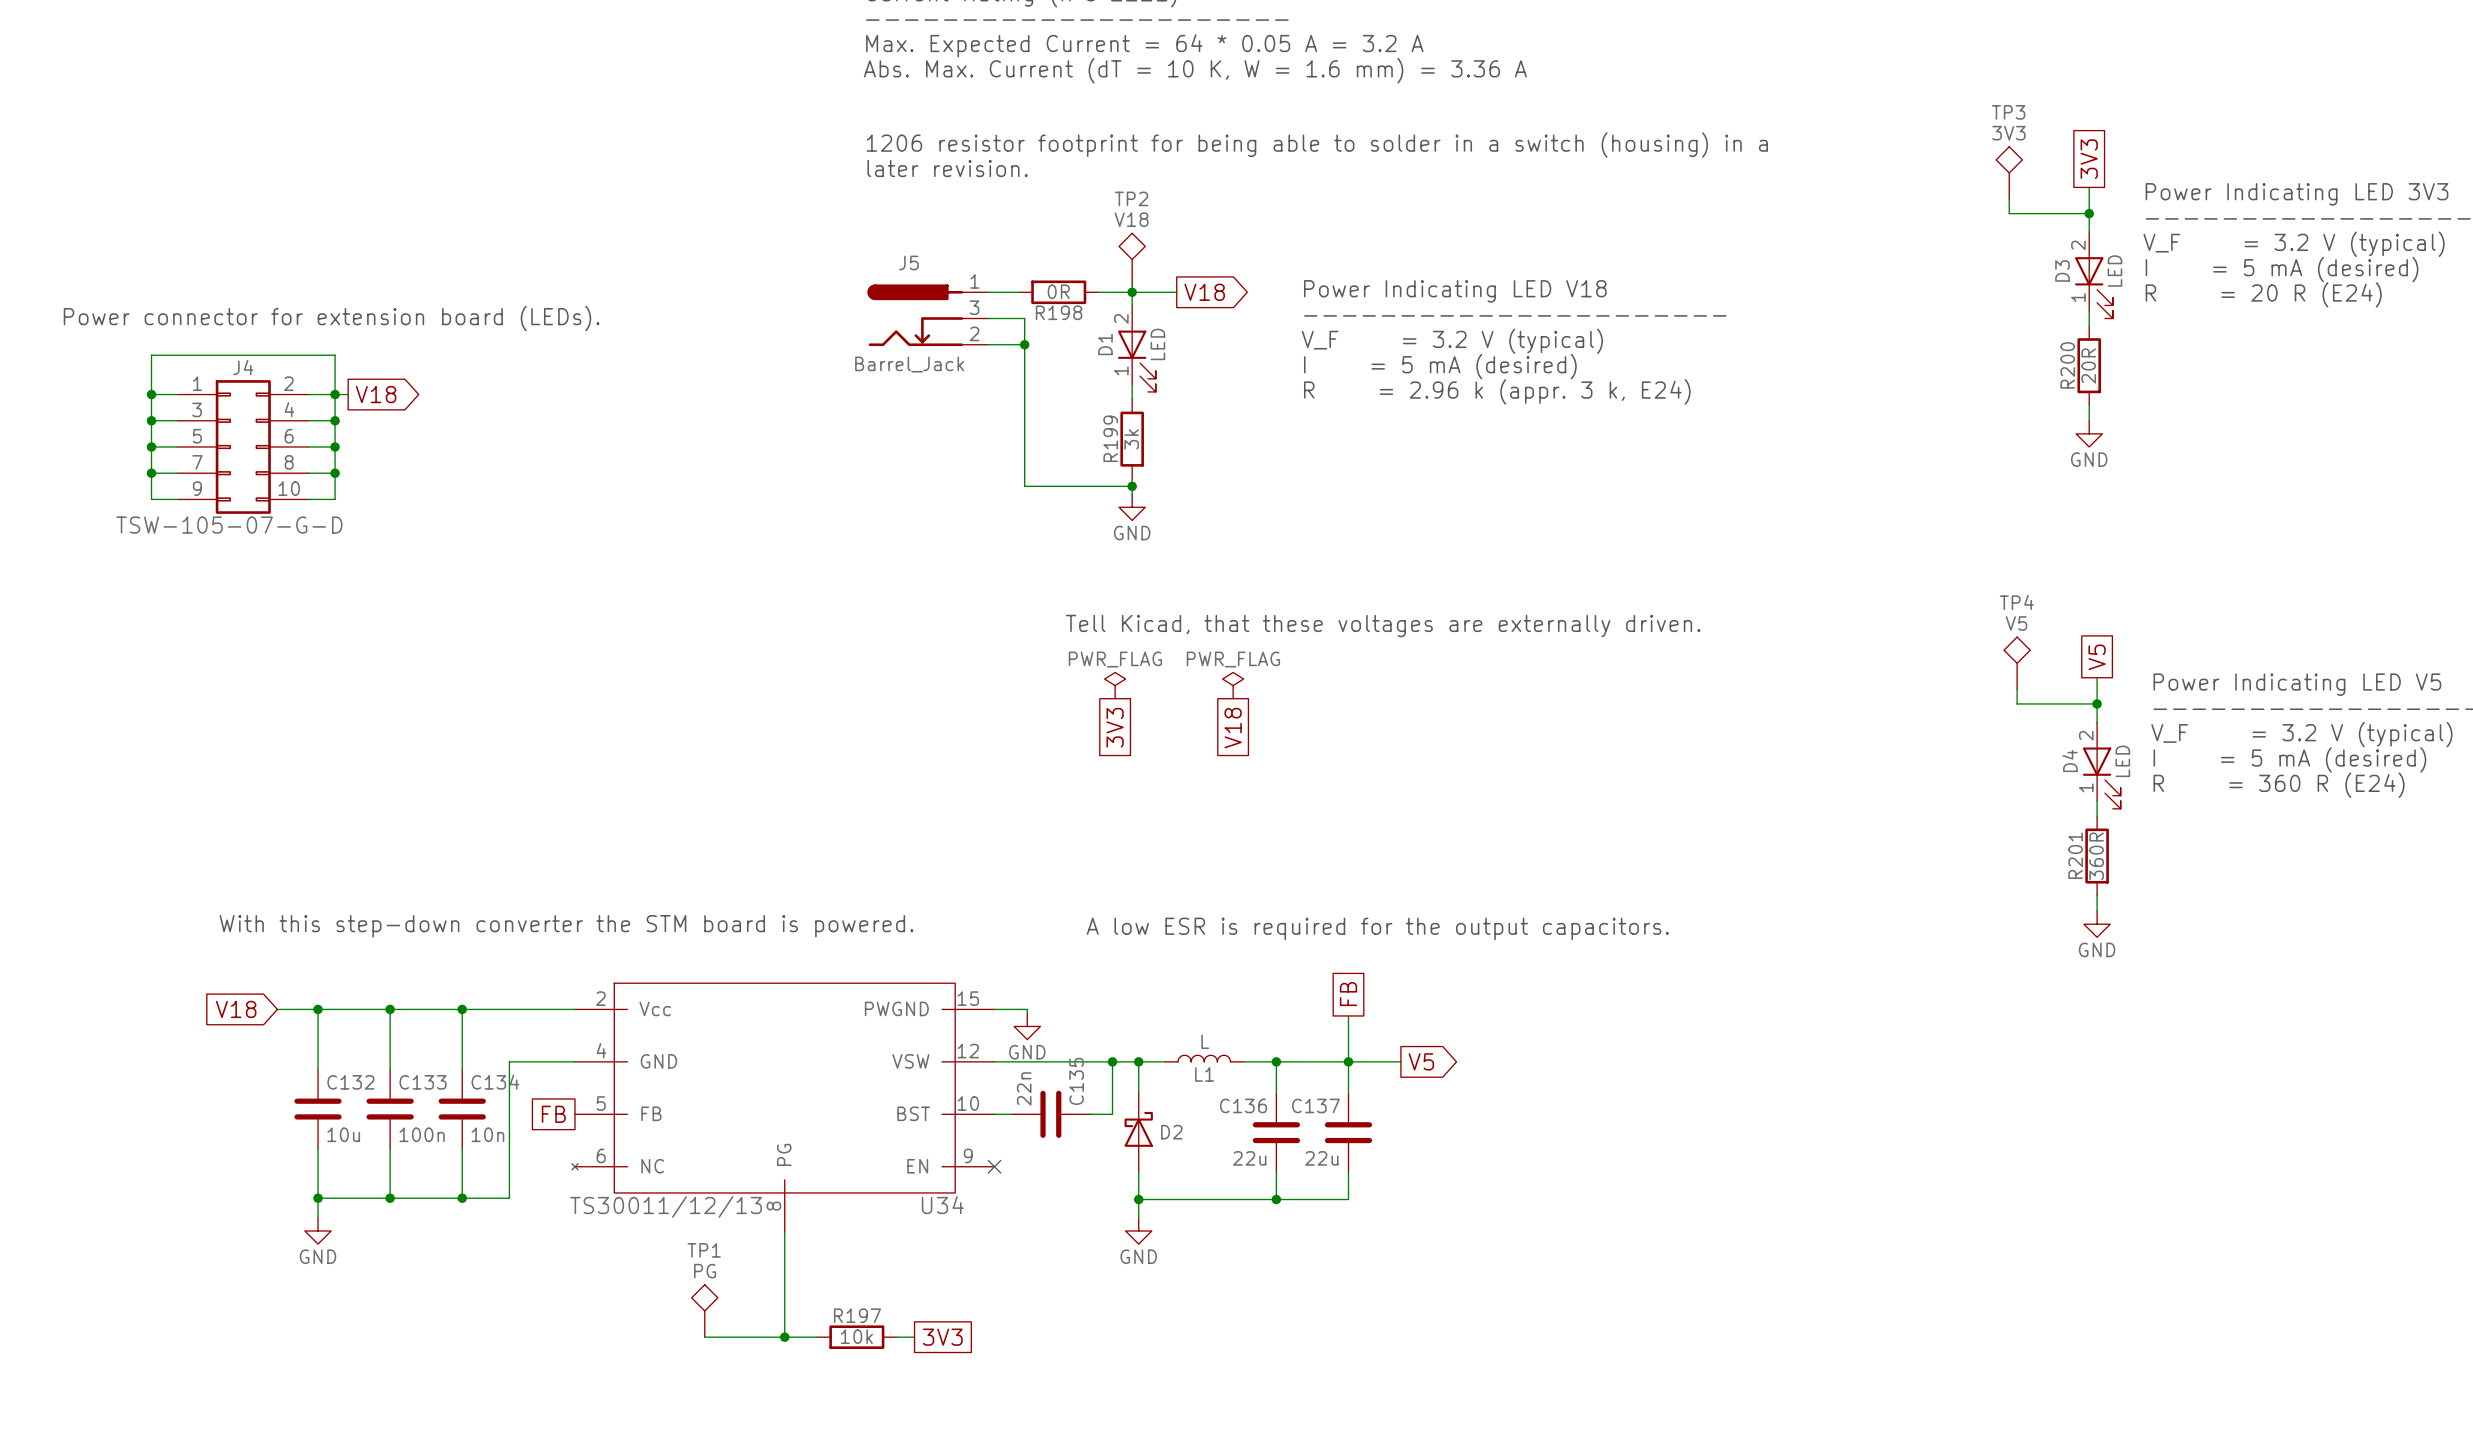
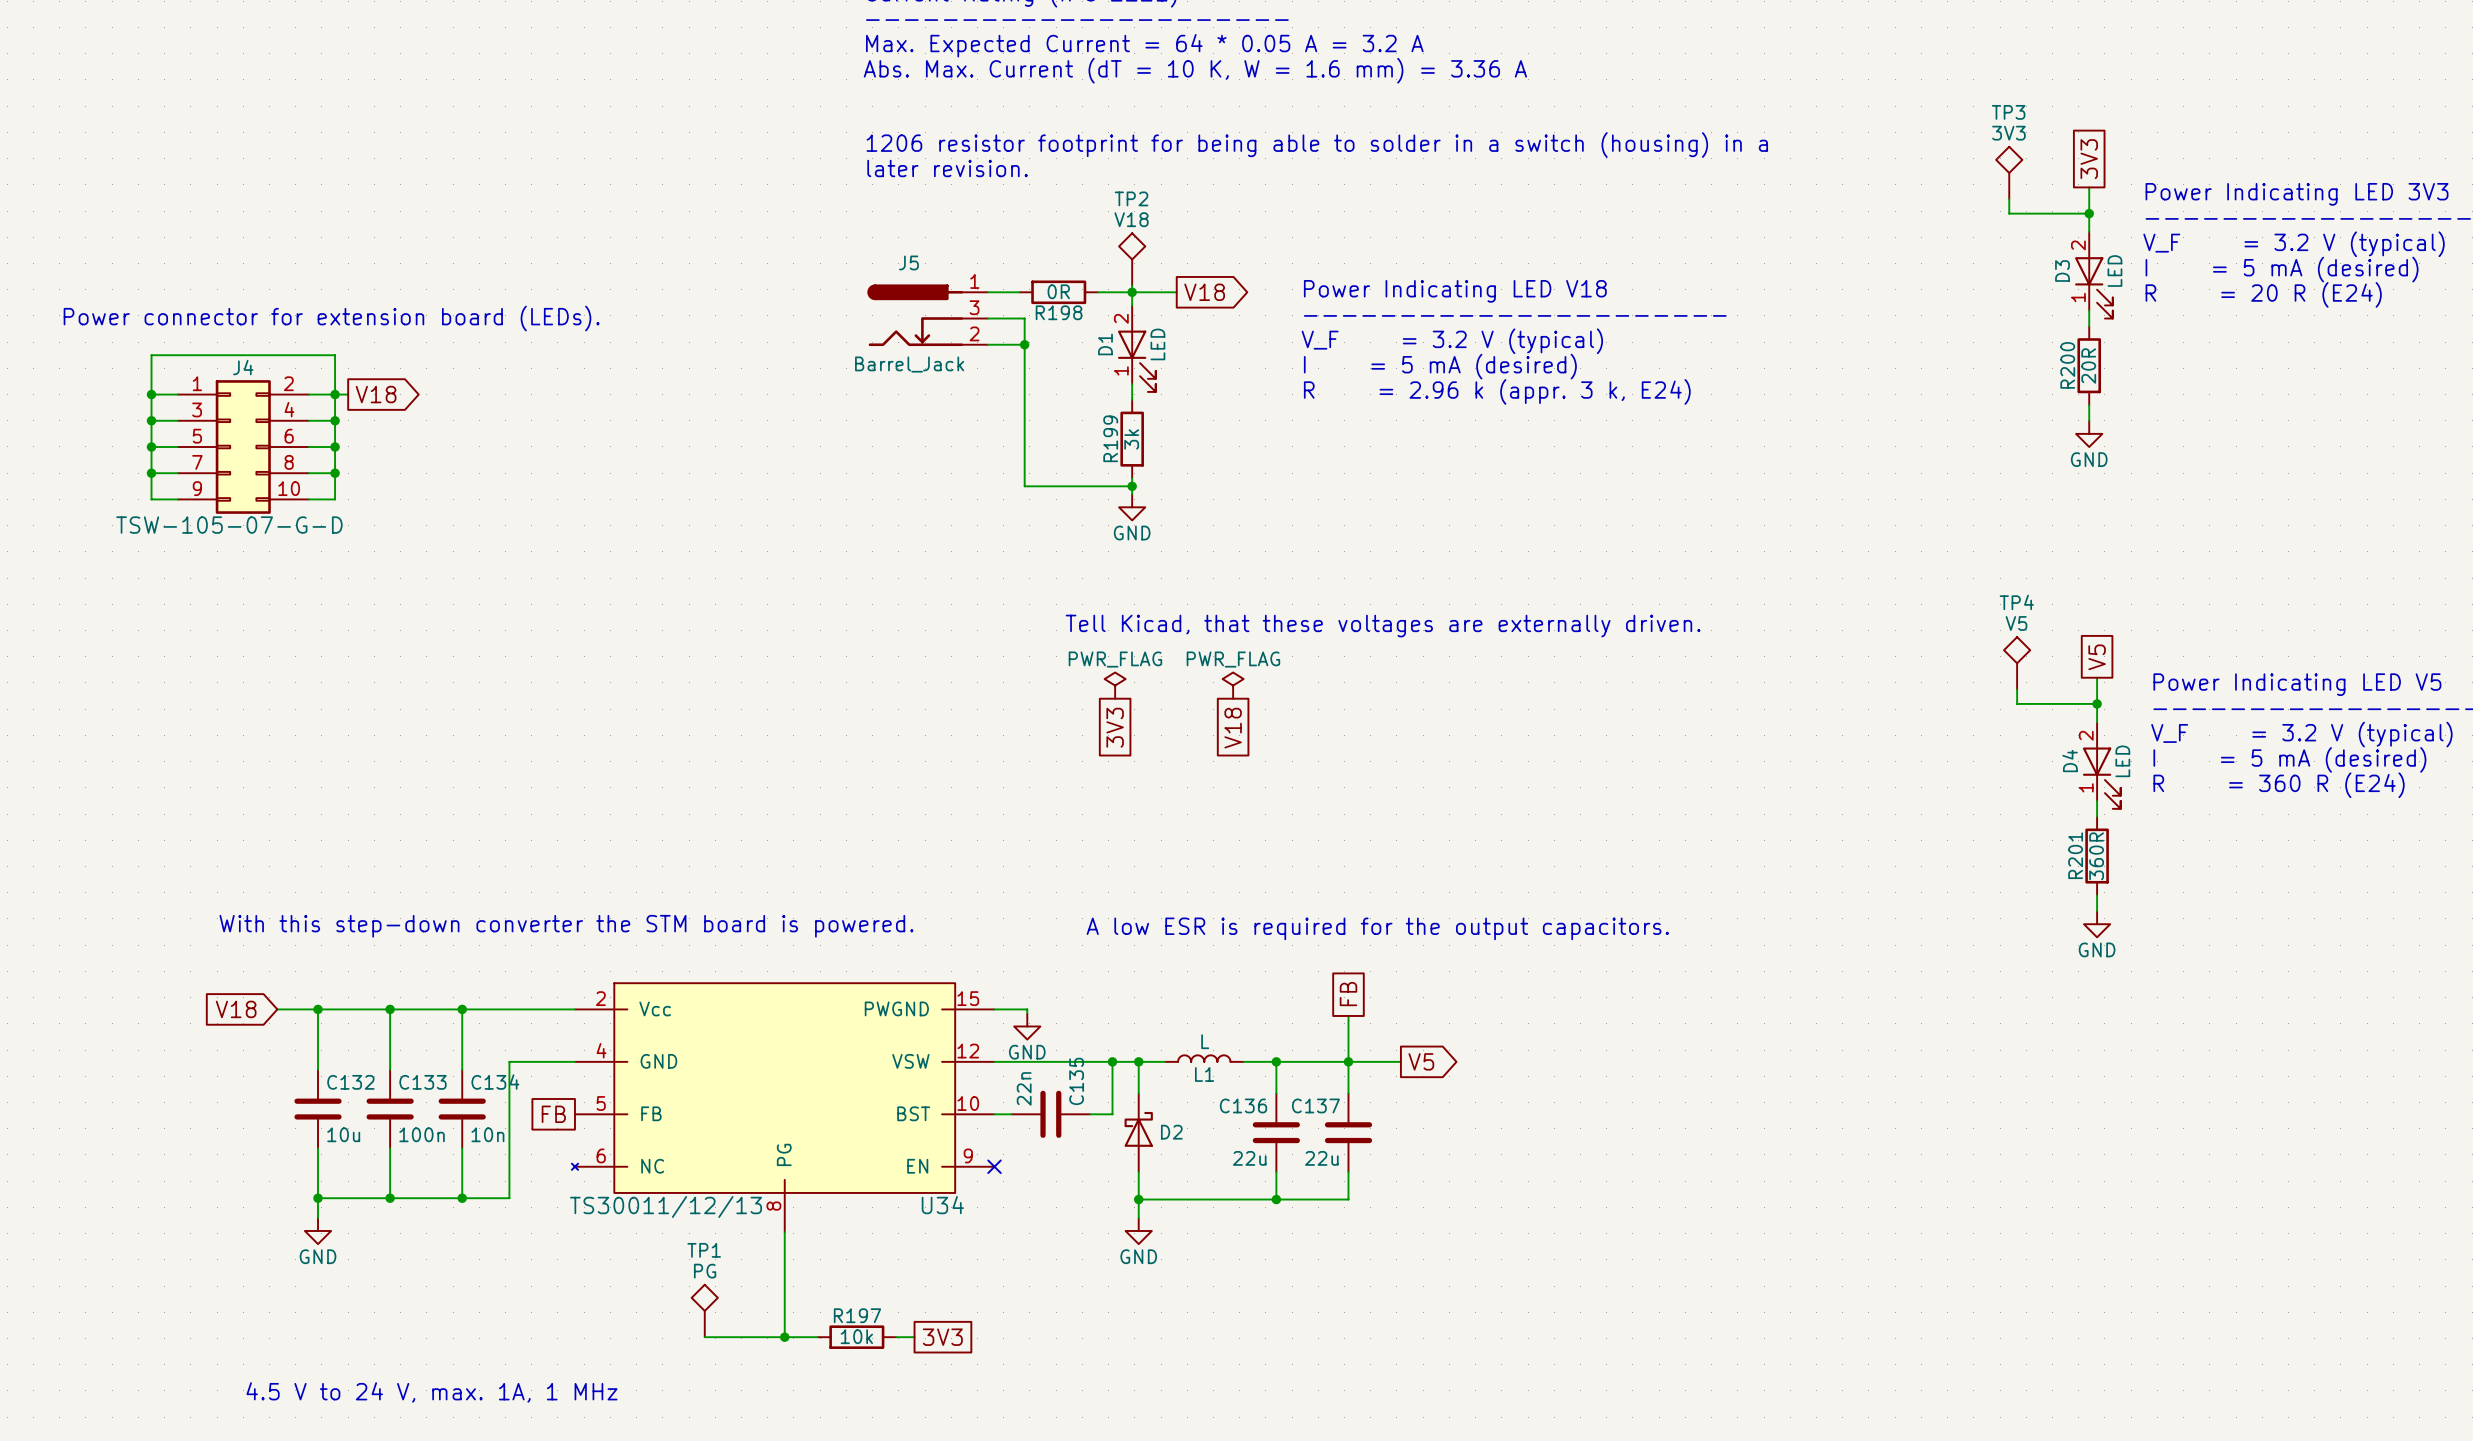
text: none -> 4.5 V to 24 V, max. 1A, 1 MHz (431, 1392)

